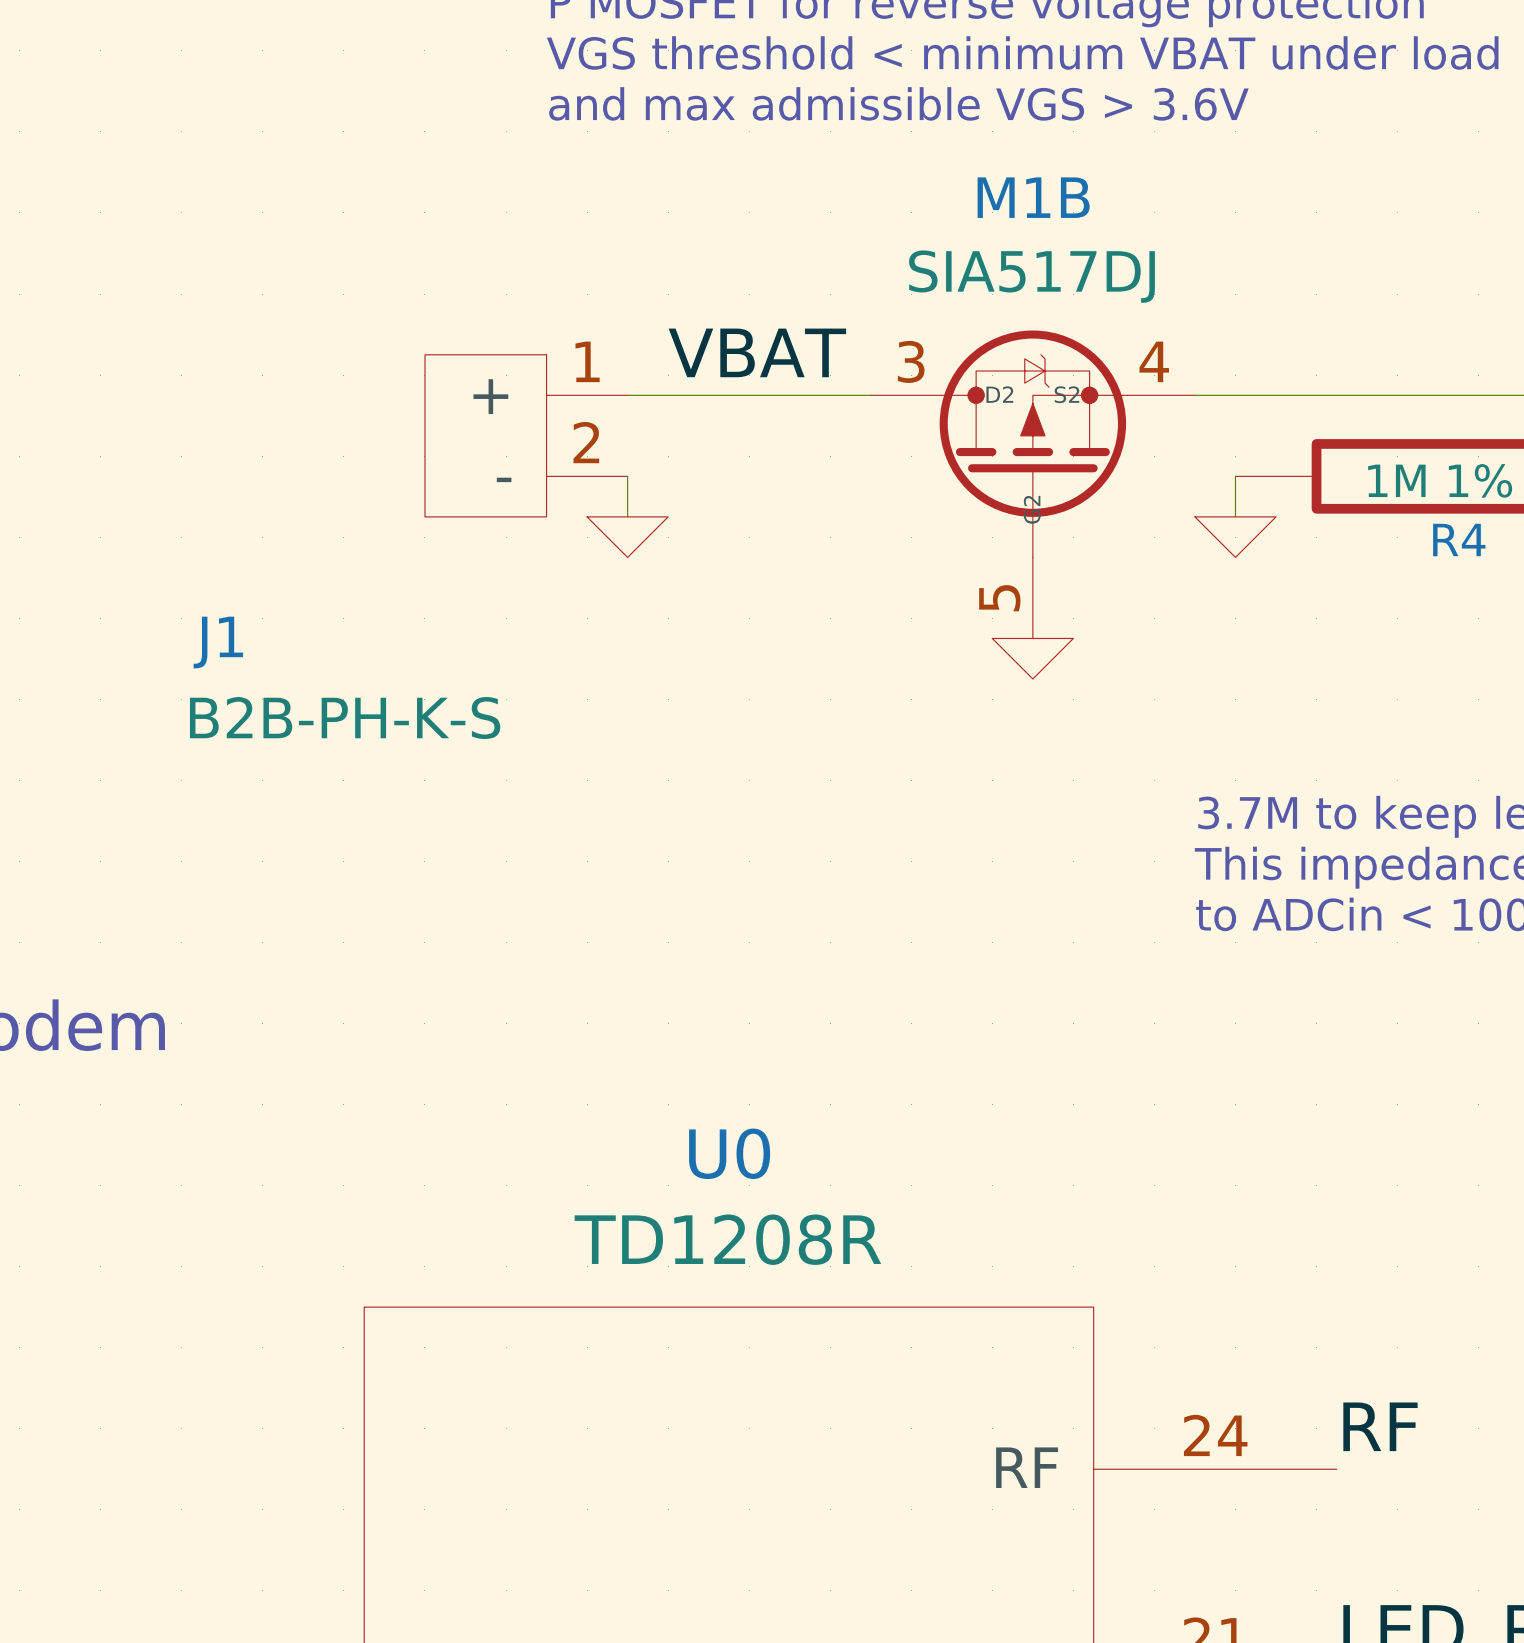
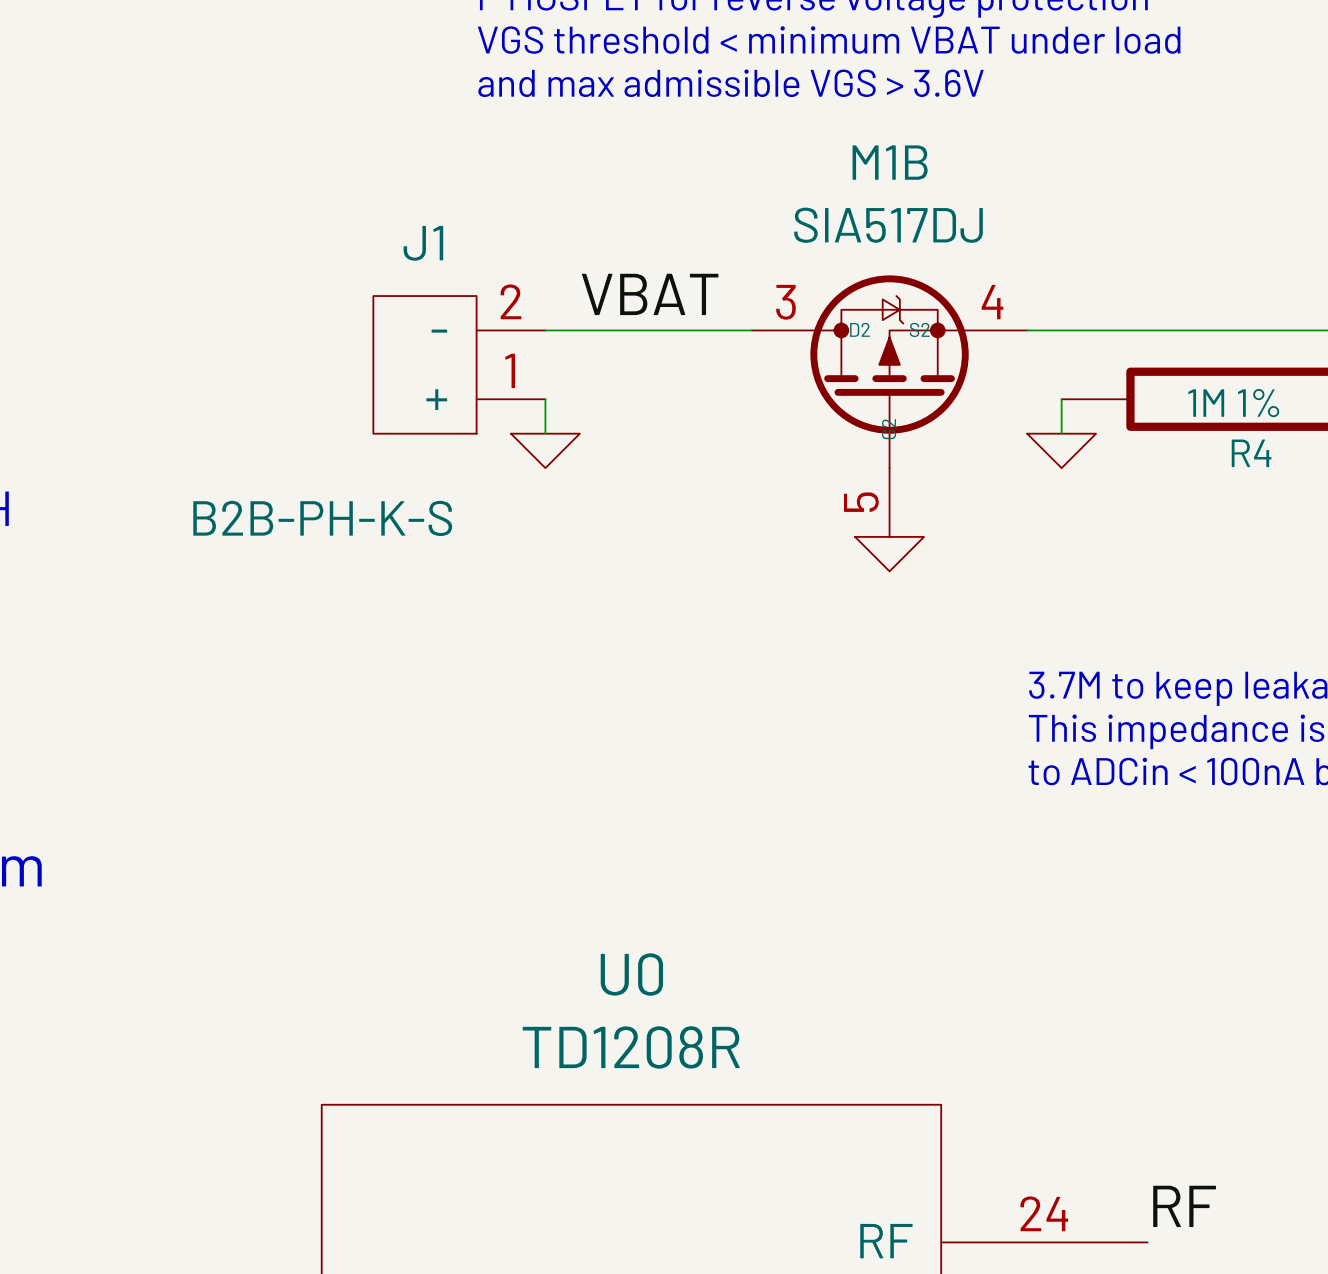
J1 flip: as is (485, 435) -> up-down (424, 364)
J1 name position: J1 (218, 642) -> J1 (423, 243)
J1 value position: B2B-PH-K-S (345, 718) -> B2B-PH-K-S (322, 518)

